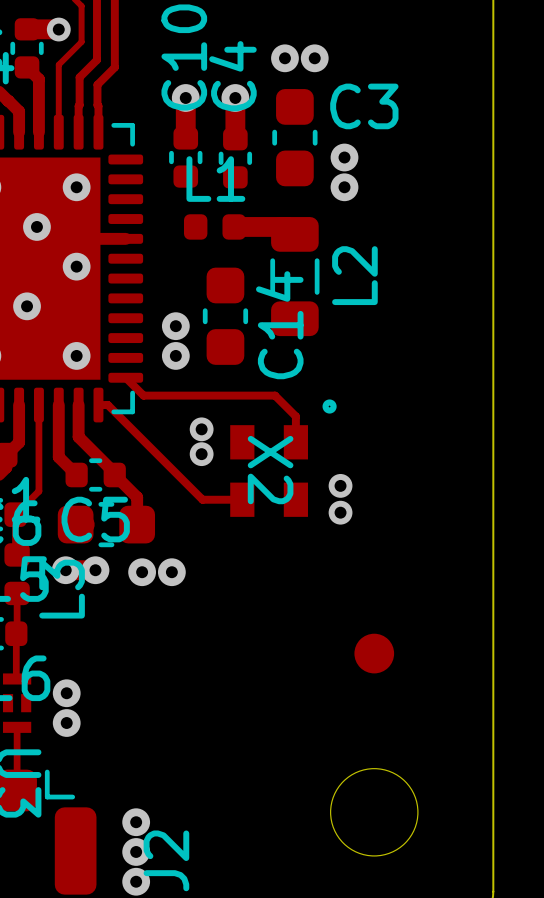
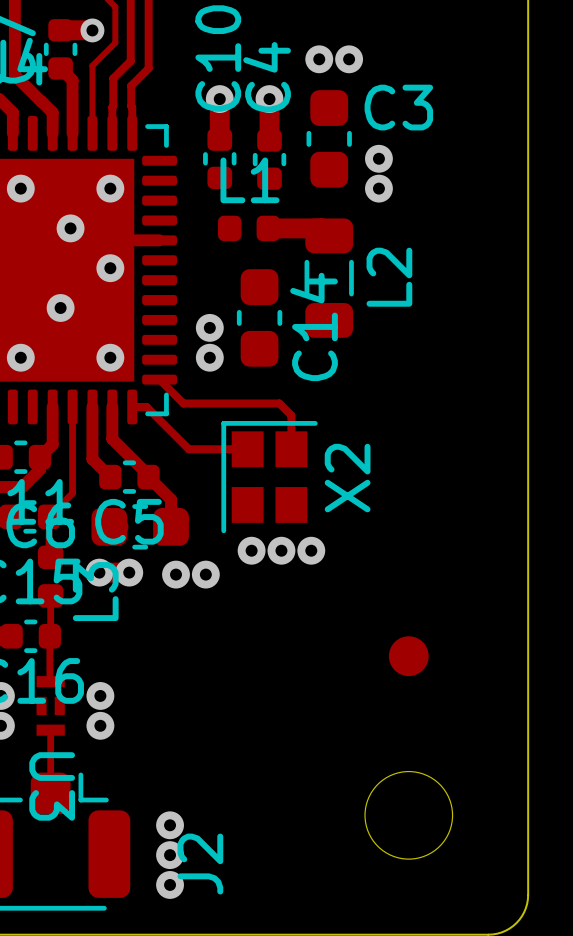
track: (143, 395) (275, 395) (295, 416) (295, 442) -> (177, 397) (183, 403) (279, 403) (291, 415) (291, 449)
X2 footprint: [230, 399, 337, 517] -> [221, 421, 318, 534]
track: (107, 405) (202, 499) (242, 499) -> (141, 406) (146, 406) (188, 449) (247, 449)
via: (201, 429) -> none
via: (201, 454) -> none
X2 name position: X2 (270, 470) -> X2 (347, 478)
via: (340, 485) -> none
via: (340, 512) -> none
via: none -> (251, 550)
via: none -> (281, 550)
via: none -> (311, 550)

